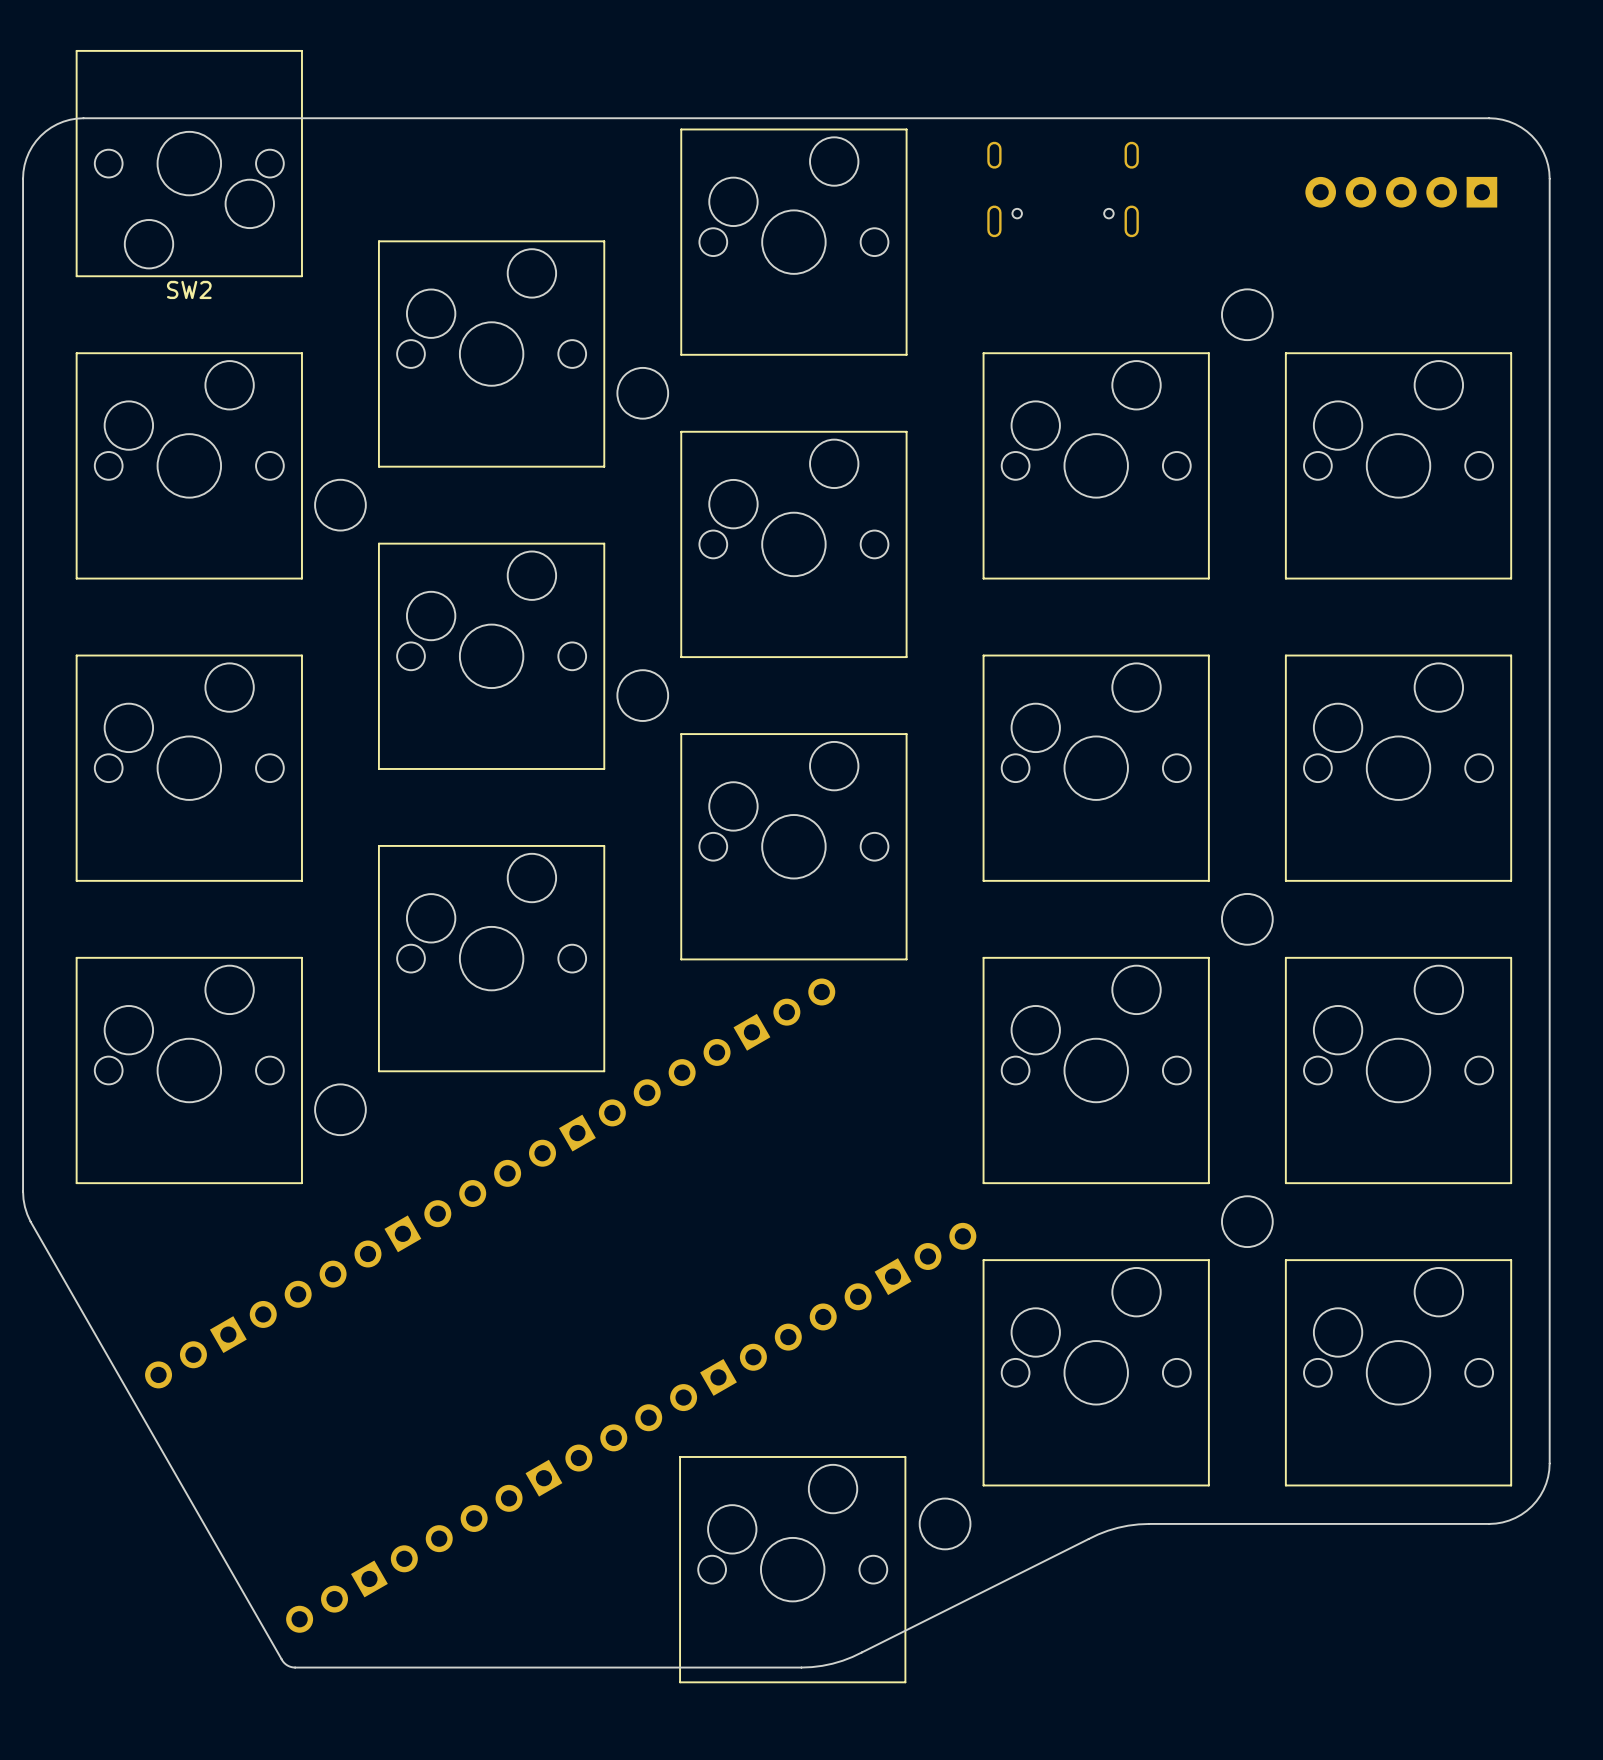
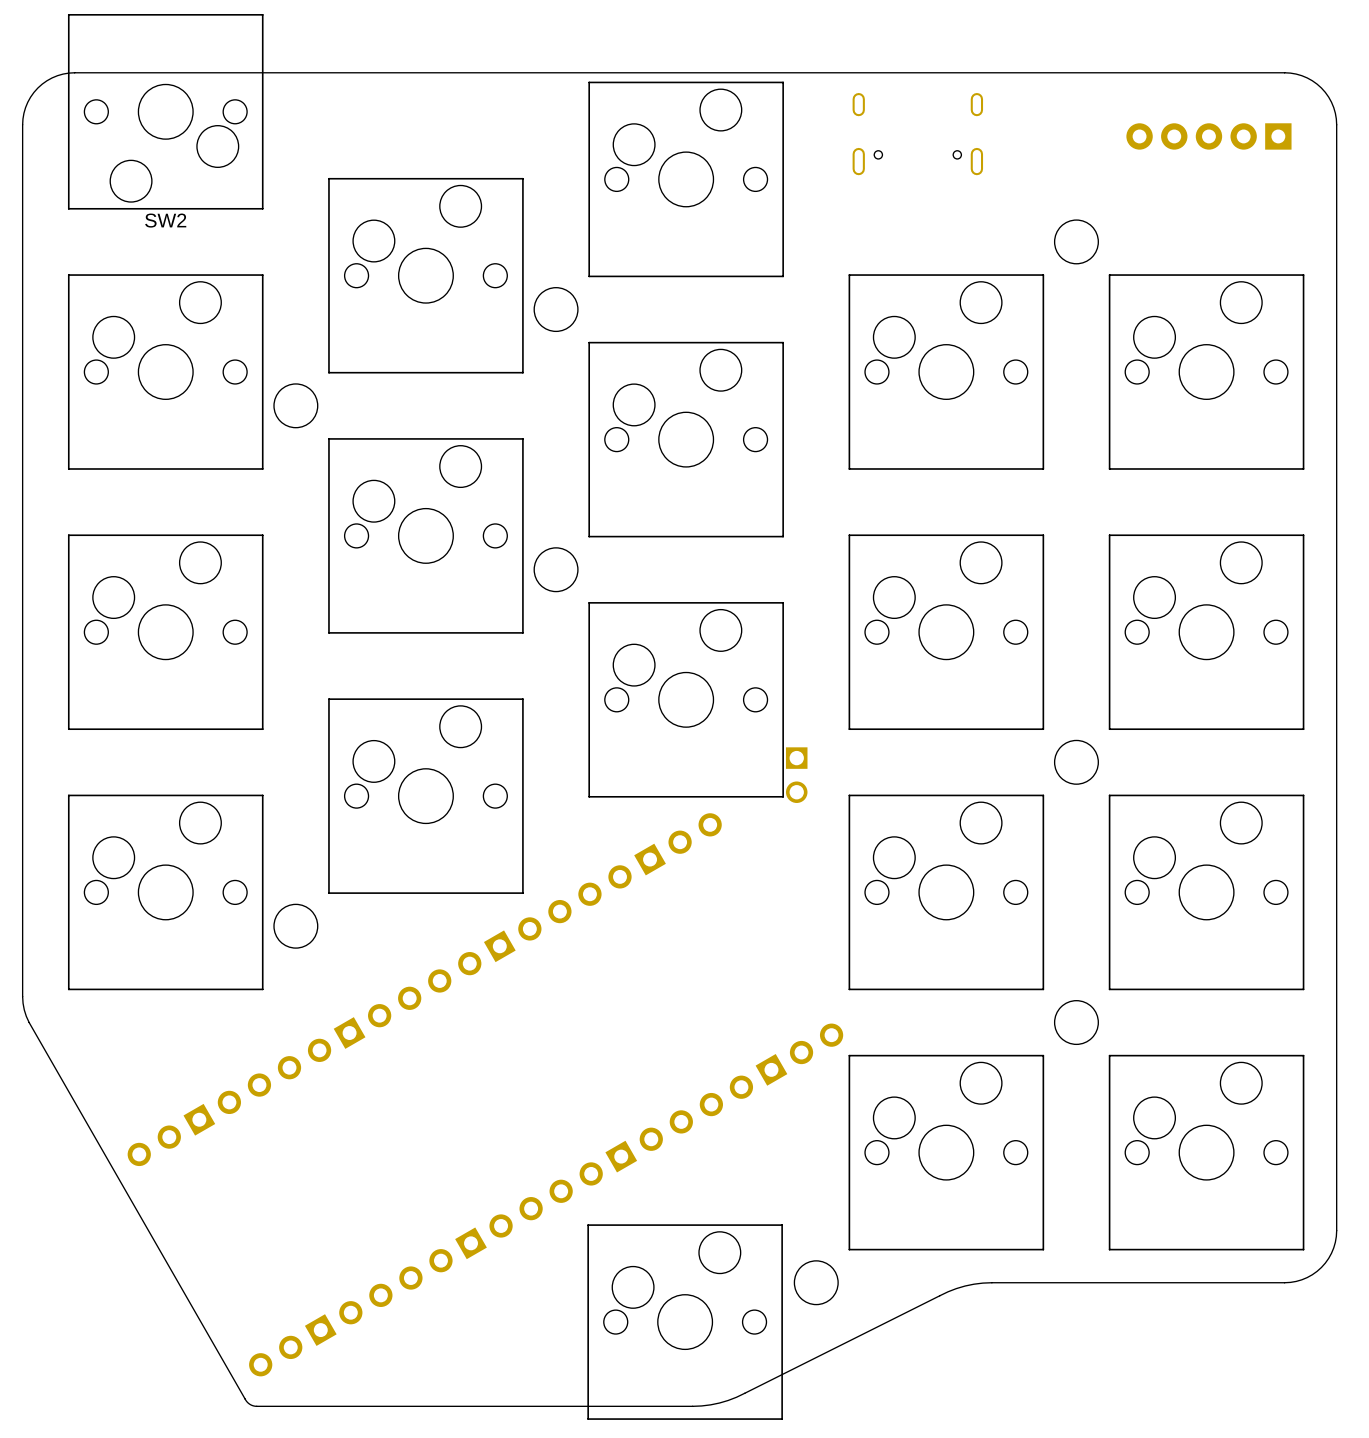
part: none -> (796, 775)

